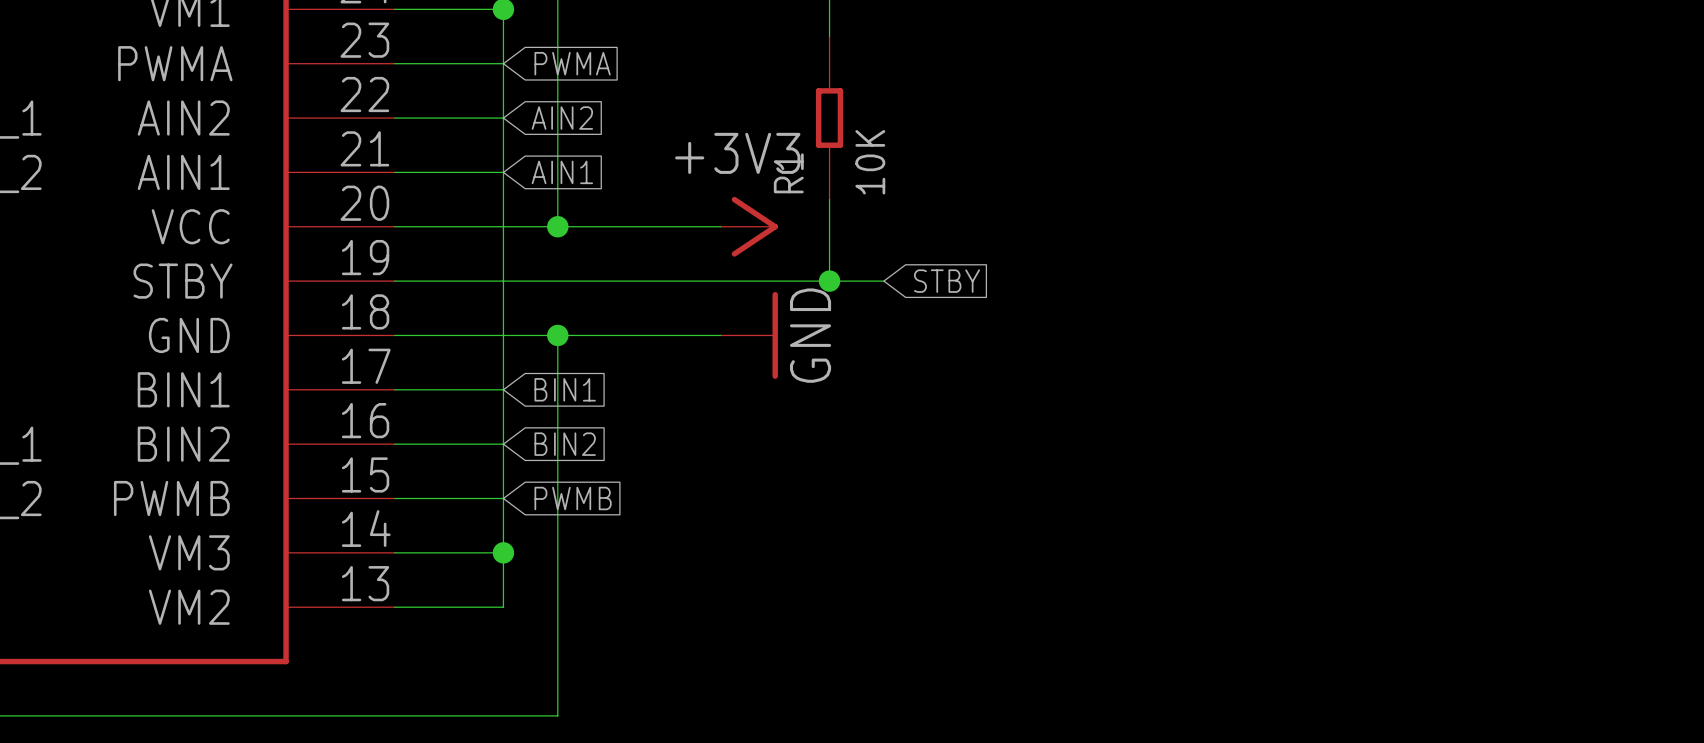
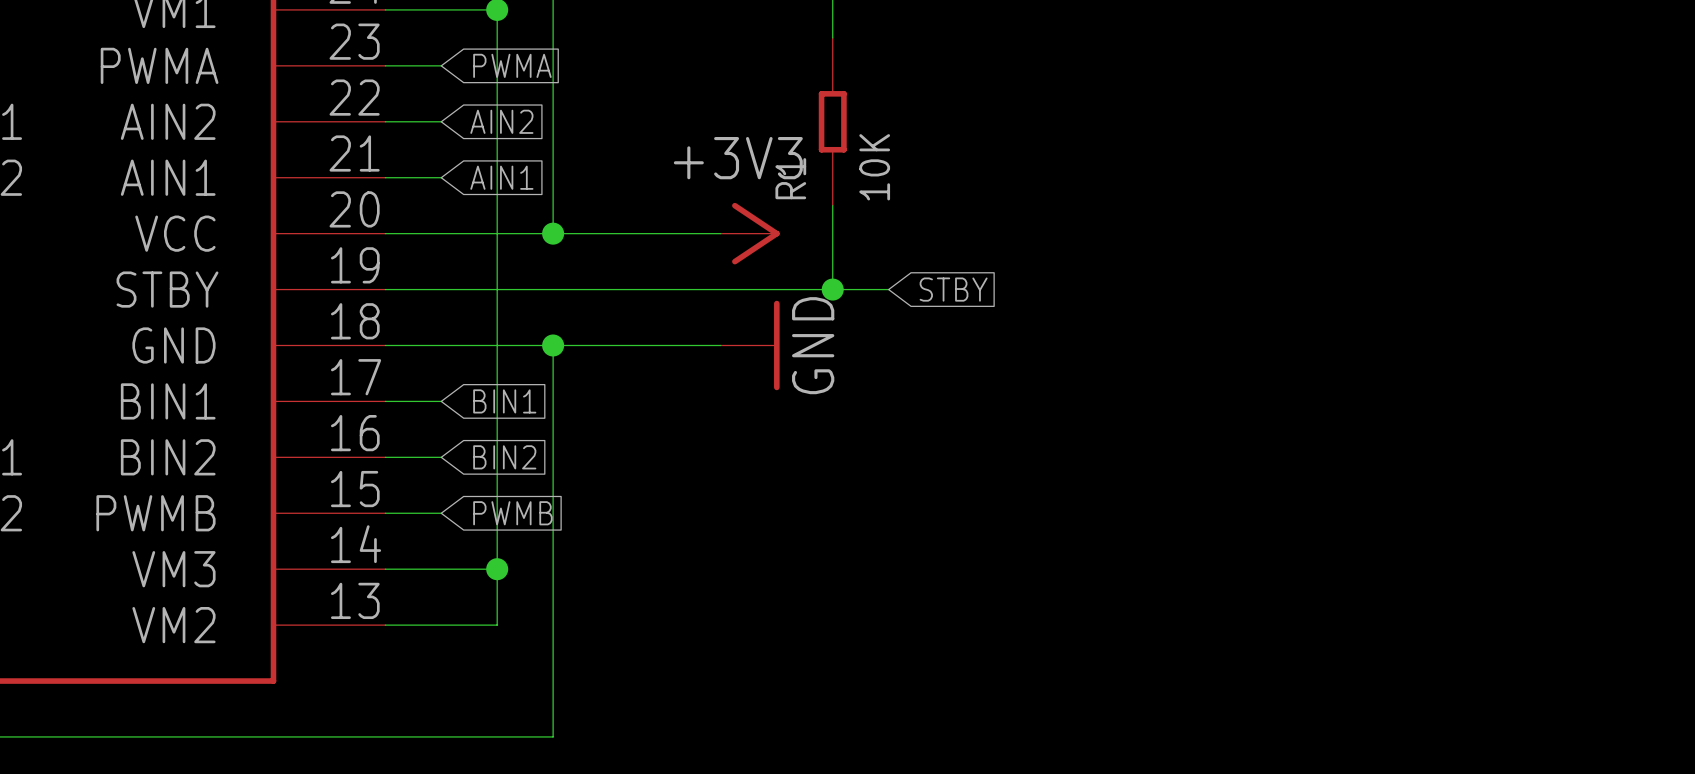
wire: (449, 63) (503, 63) -> none
global label position: PWMA (572, 63) -> PWMA (512, 65)
wire: (449, 118) (503, 118) -> none
global label position: AIN2 (562, 118) -> AIN2 (501, 121)
wire: (449, 172) (503, 172) -> none
global label position: AIN1 (562, 172) -> AIN1 (501, 177)
wire: (449, 389) (503, 389) -> none
global label position: BIN1 (565, 389) -> BIN1 (504, 401)
wire: (449, 444) (503, 444) -> none
global label position: BIN2 (565, 444) -> BIN2 (504, 457)
wire: (449, 498) (503, 498) -> none
global label position: PWMB (573, 498) -> PWMB (512, 513)

